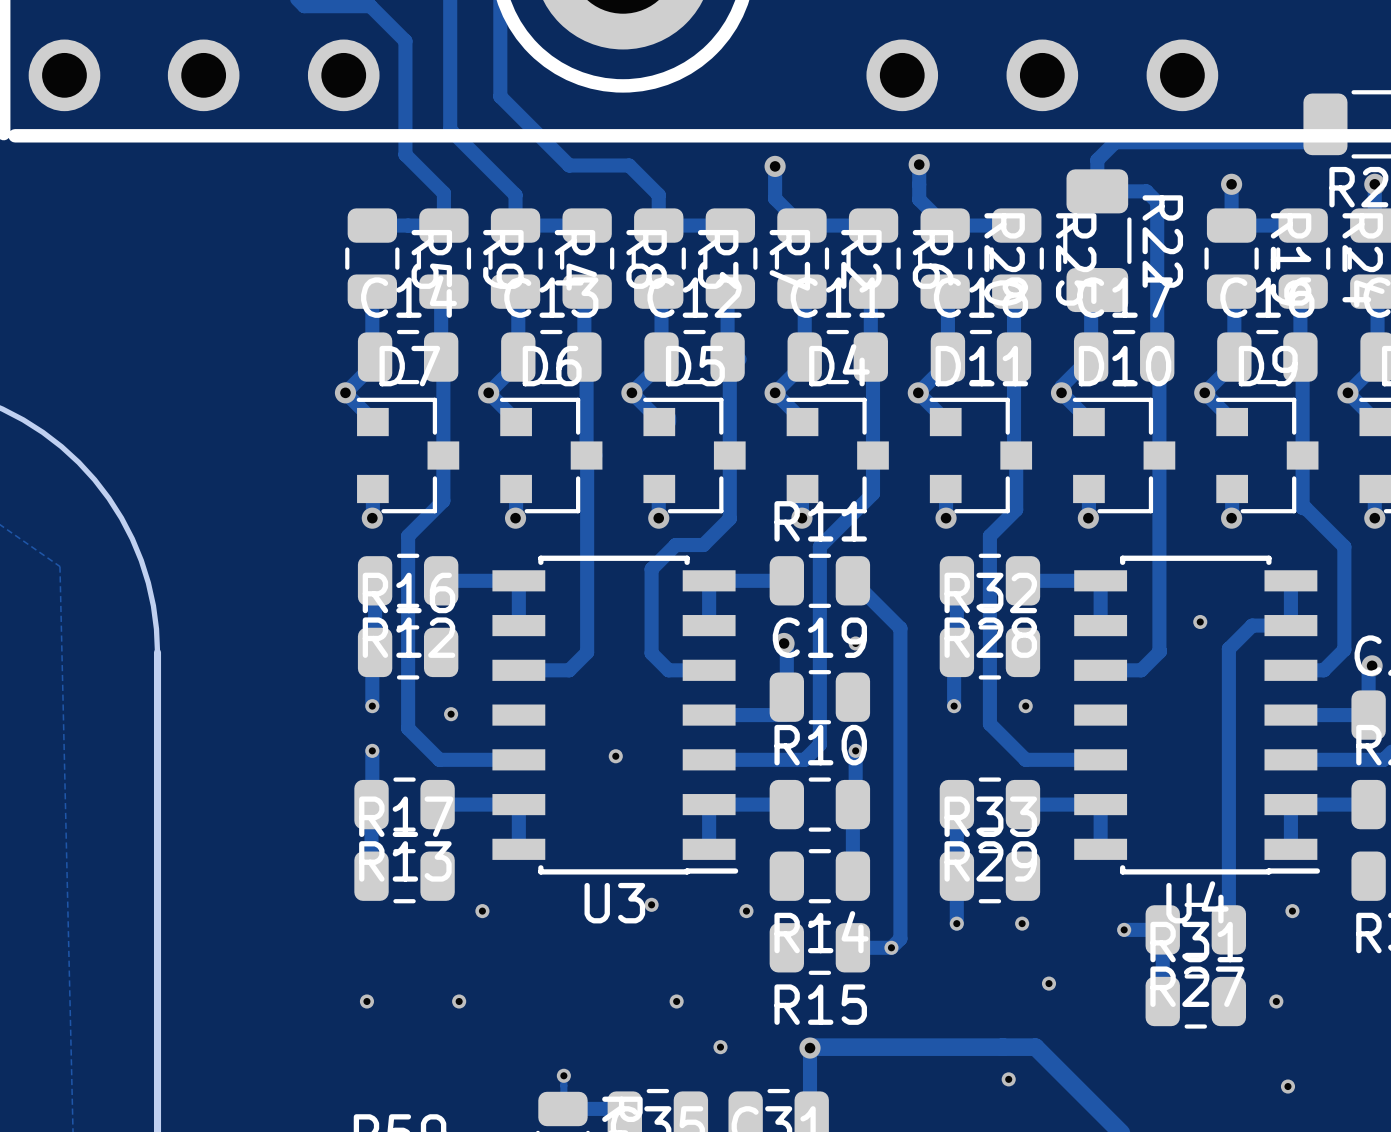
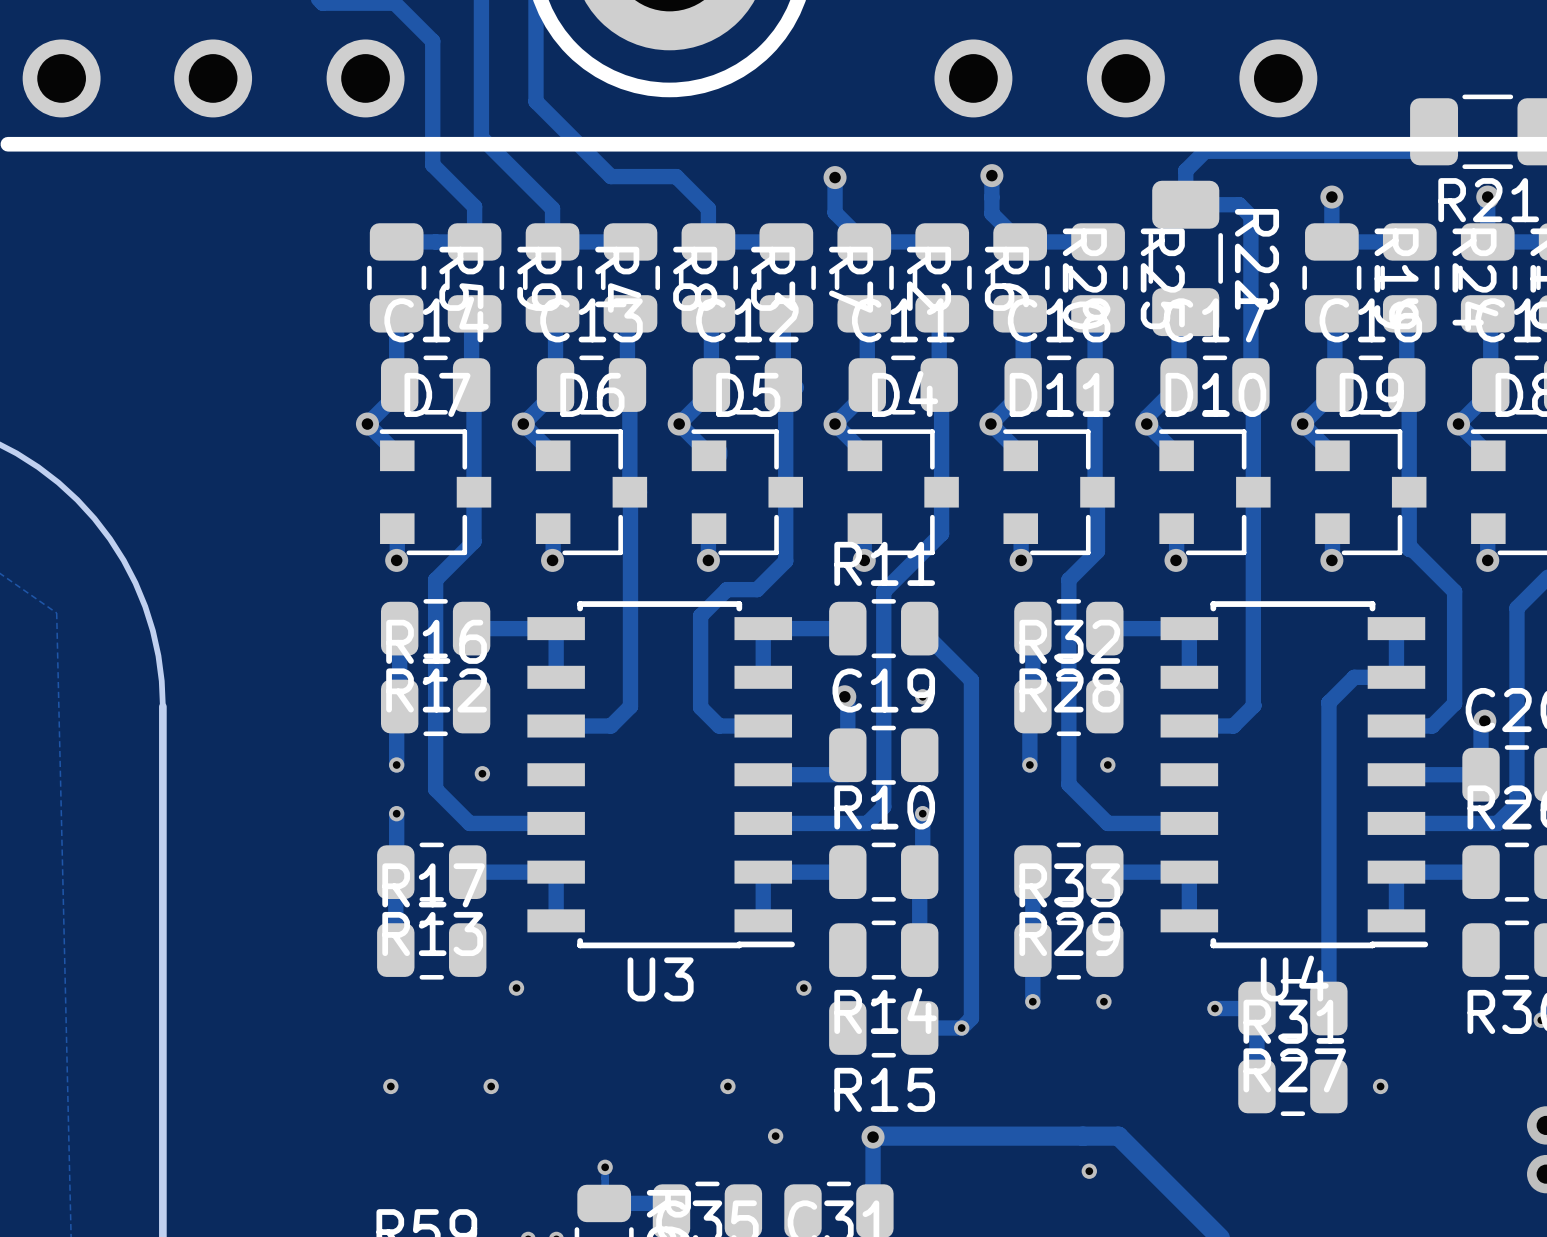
via: (1200, 621) -> none
via: (615, 756) -> none
via: (651, 904) -> none
via: (1292, 911) -> none
via: (1048, 983) -> none
via: (1287, 1086) -> none

